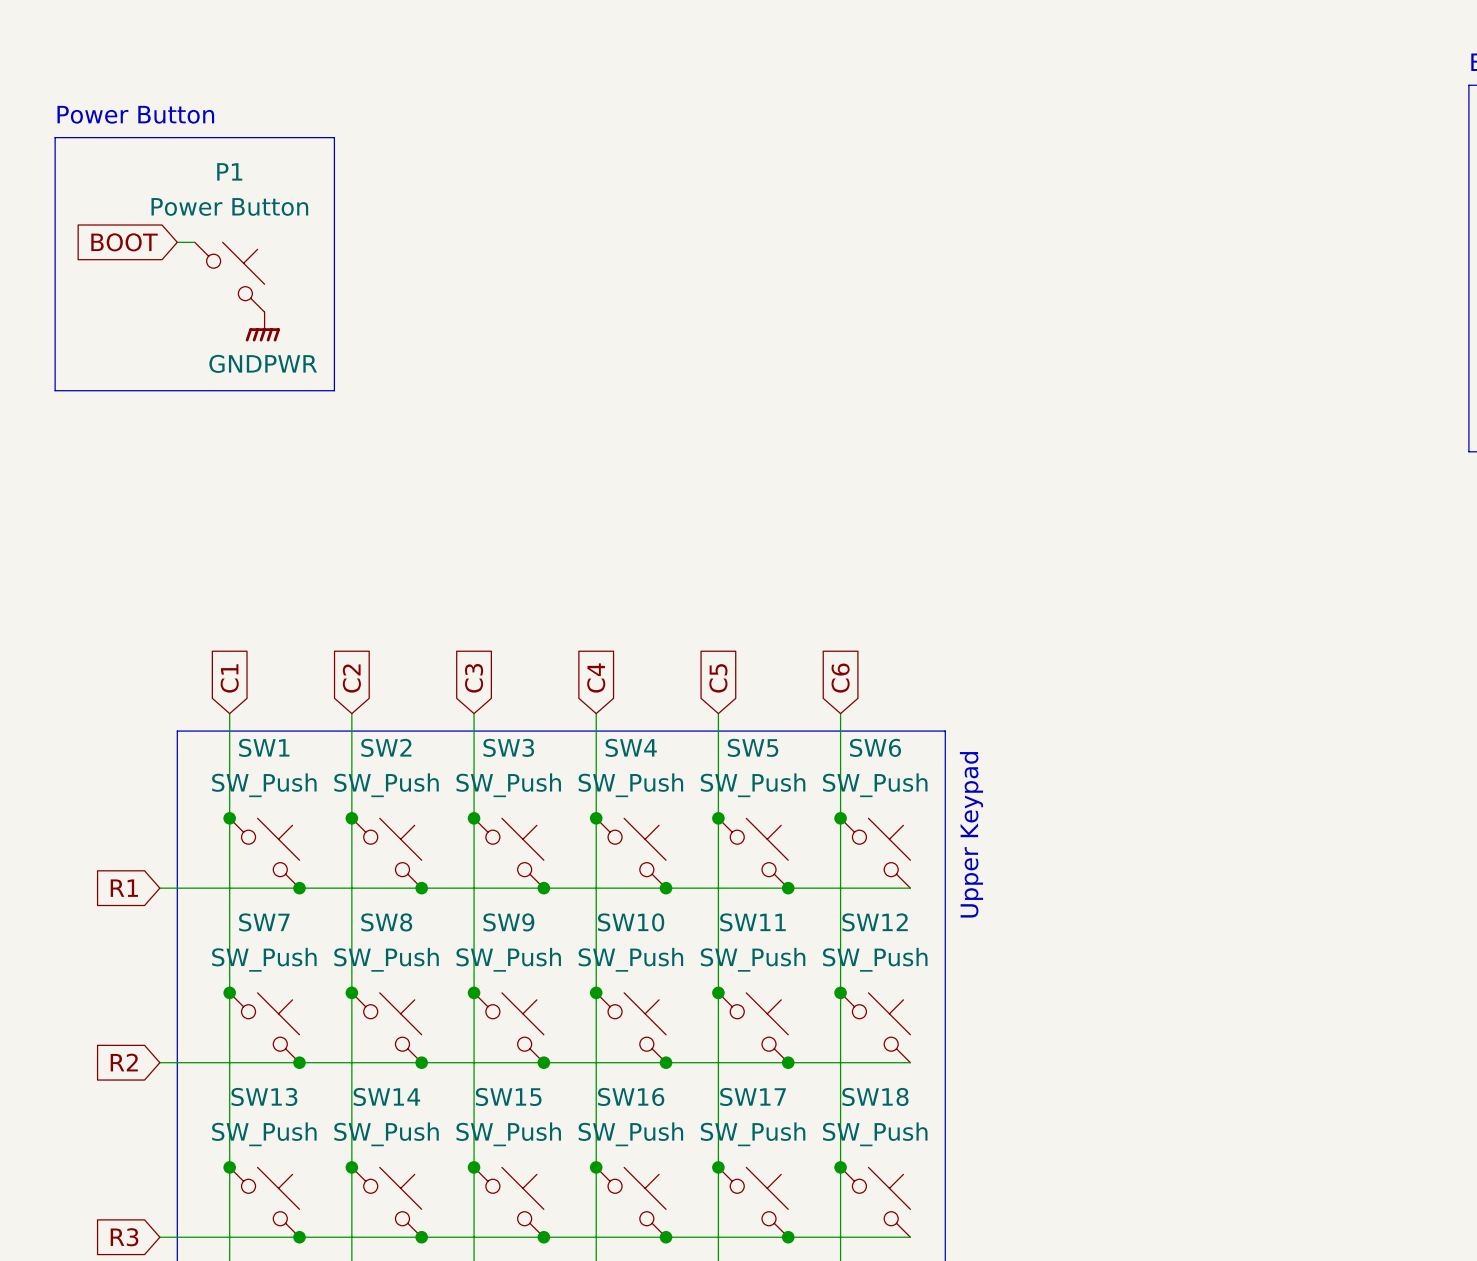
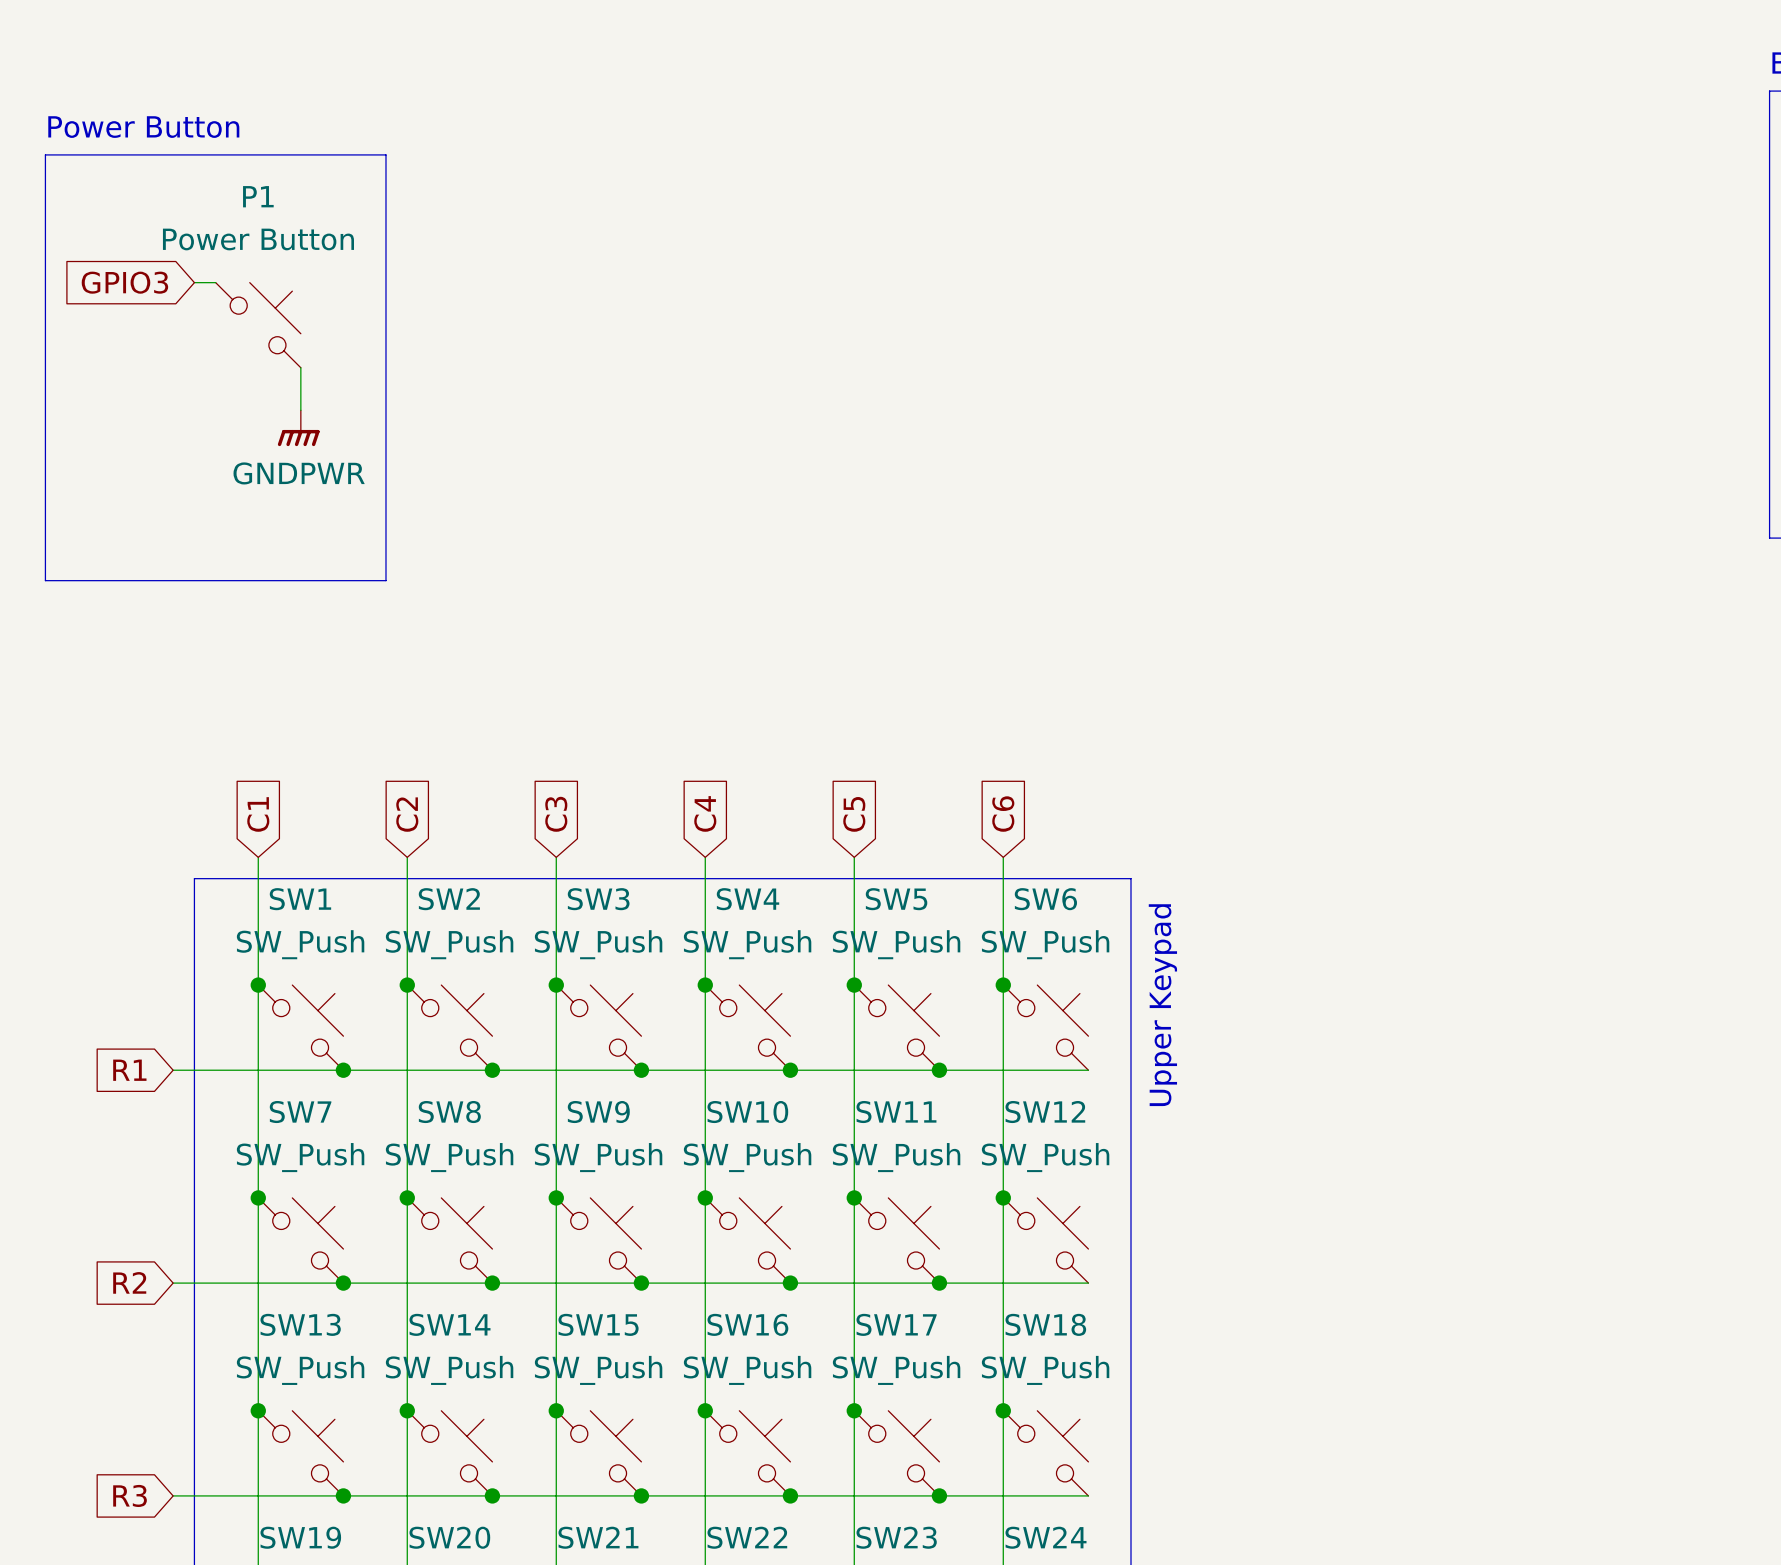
global label: BOOT (124, 242) -> GPIO3 (124, 282)
power symbol position: GNDPWR (262, 326) -> GNDPWR (298, 428)
line: (55, 390) (334, 390) -> (45, 463) (45, 580) (385, 580) (385, 463)

